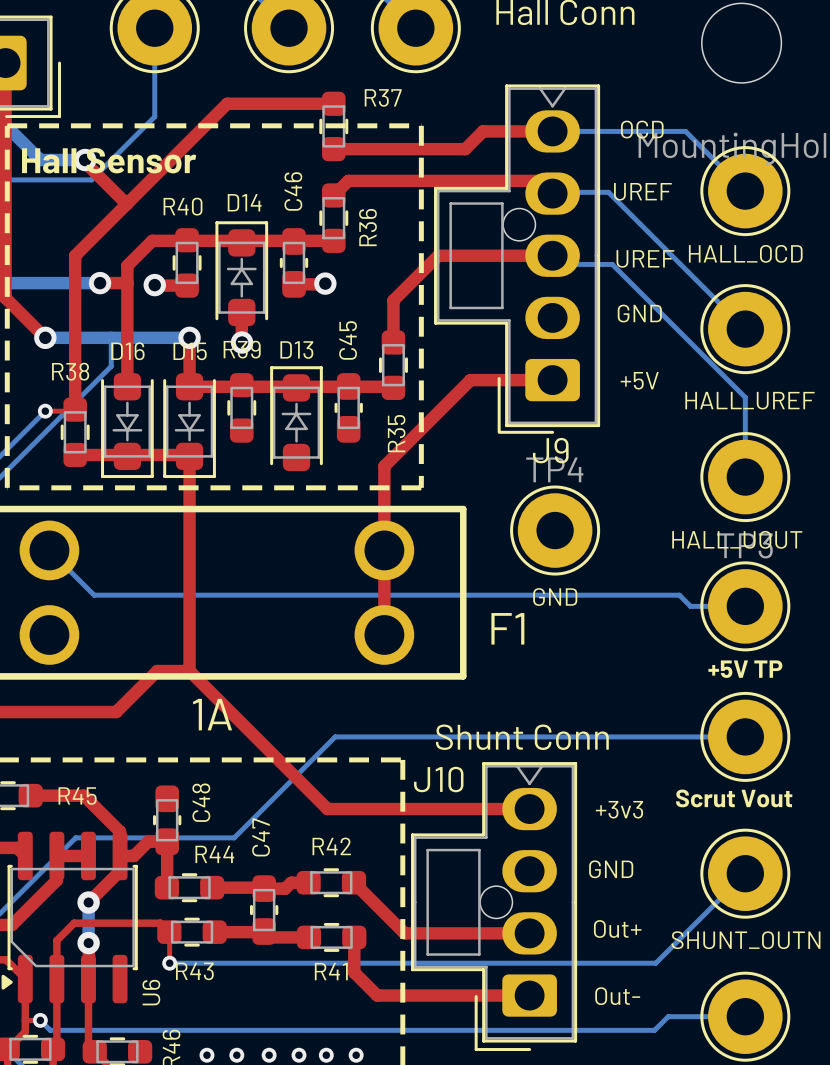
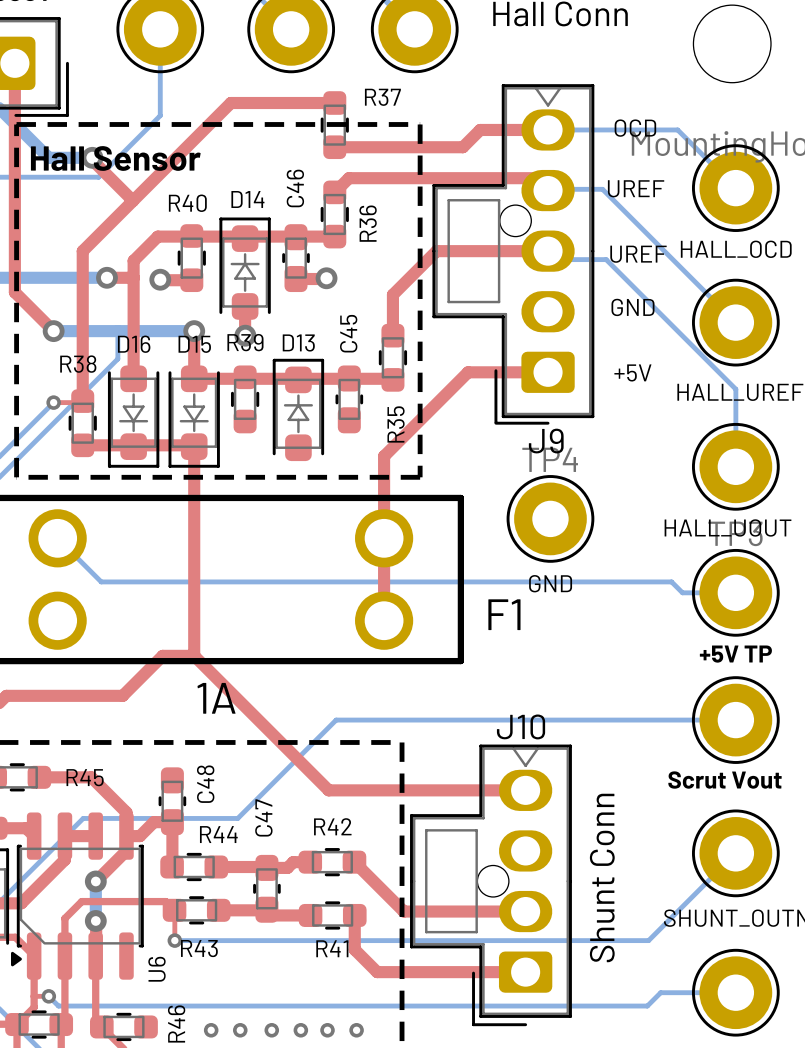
J10 value rotation: 0° (522, 737) -> 90° counterclockwise (602, 877)
J10 name position: J10 (438, 779) -> J10 (521, 726)
text: +3v3 (619, 809) -> none
text: GND (611, 869) -> none
text: Out+ (617, 928) -> none
text: Out- (617, 996) -> none

